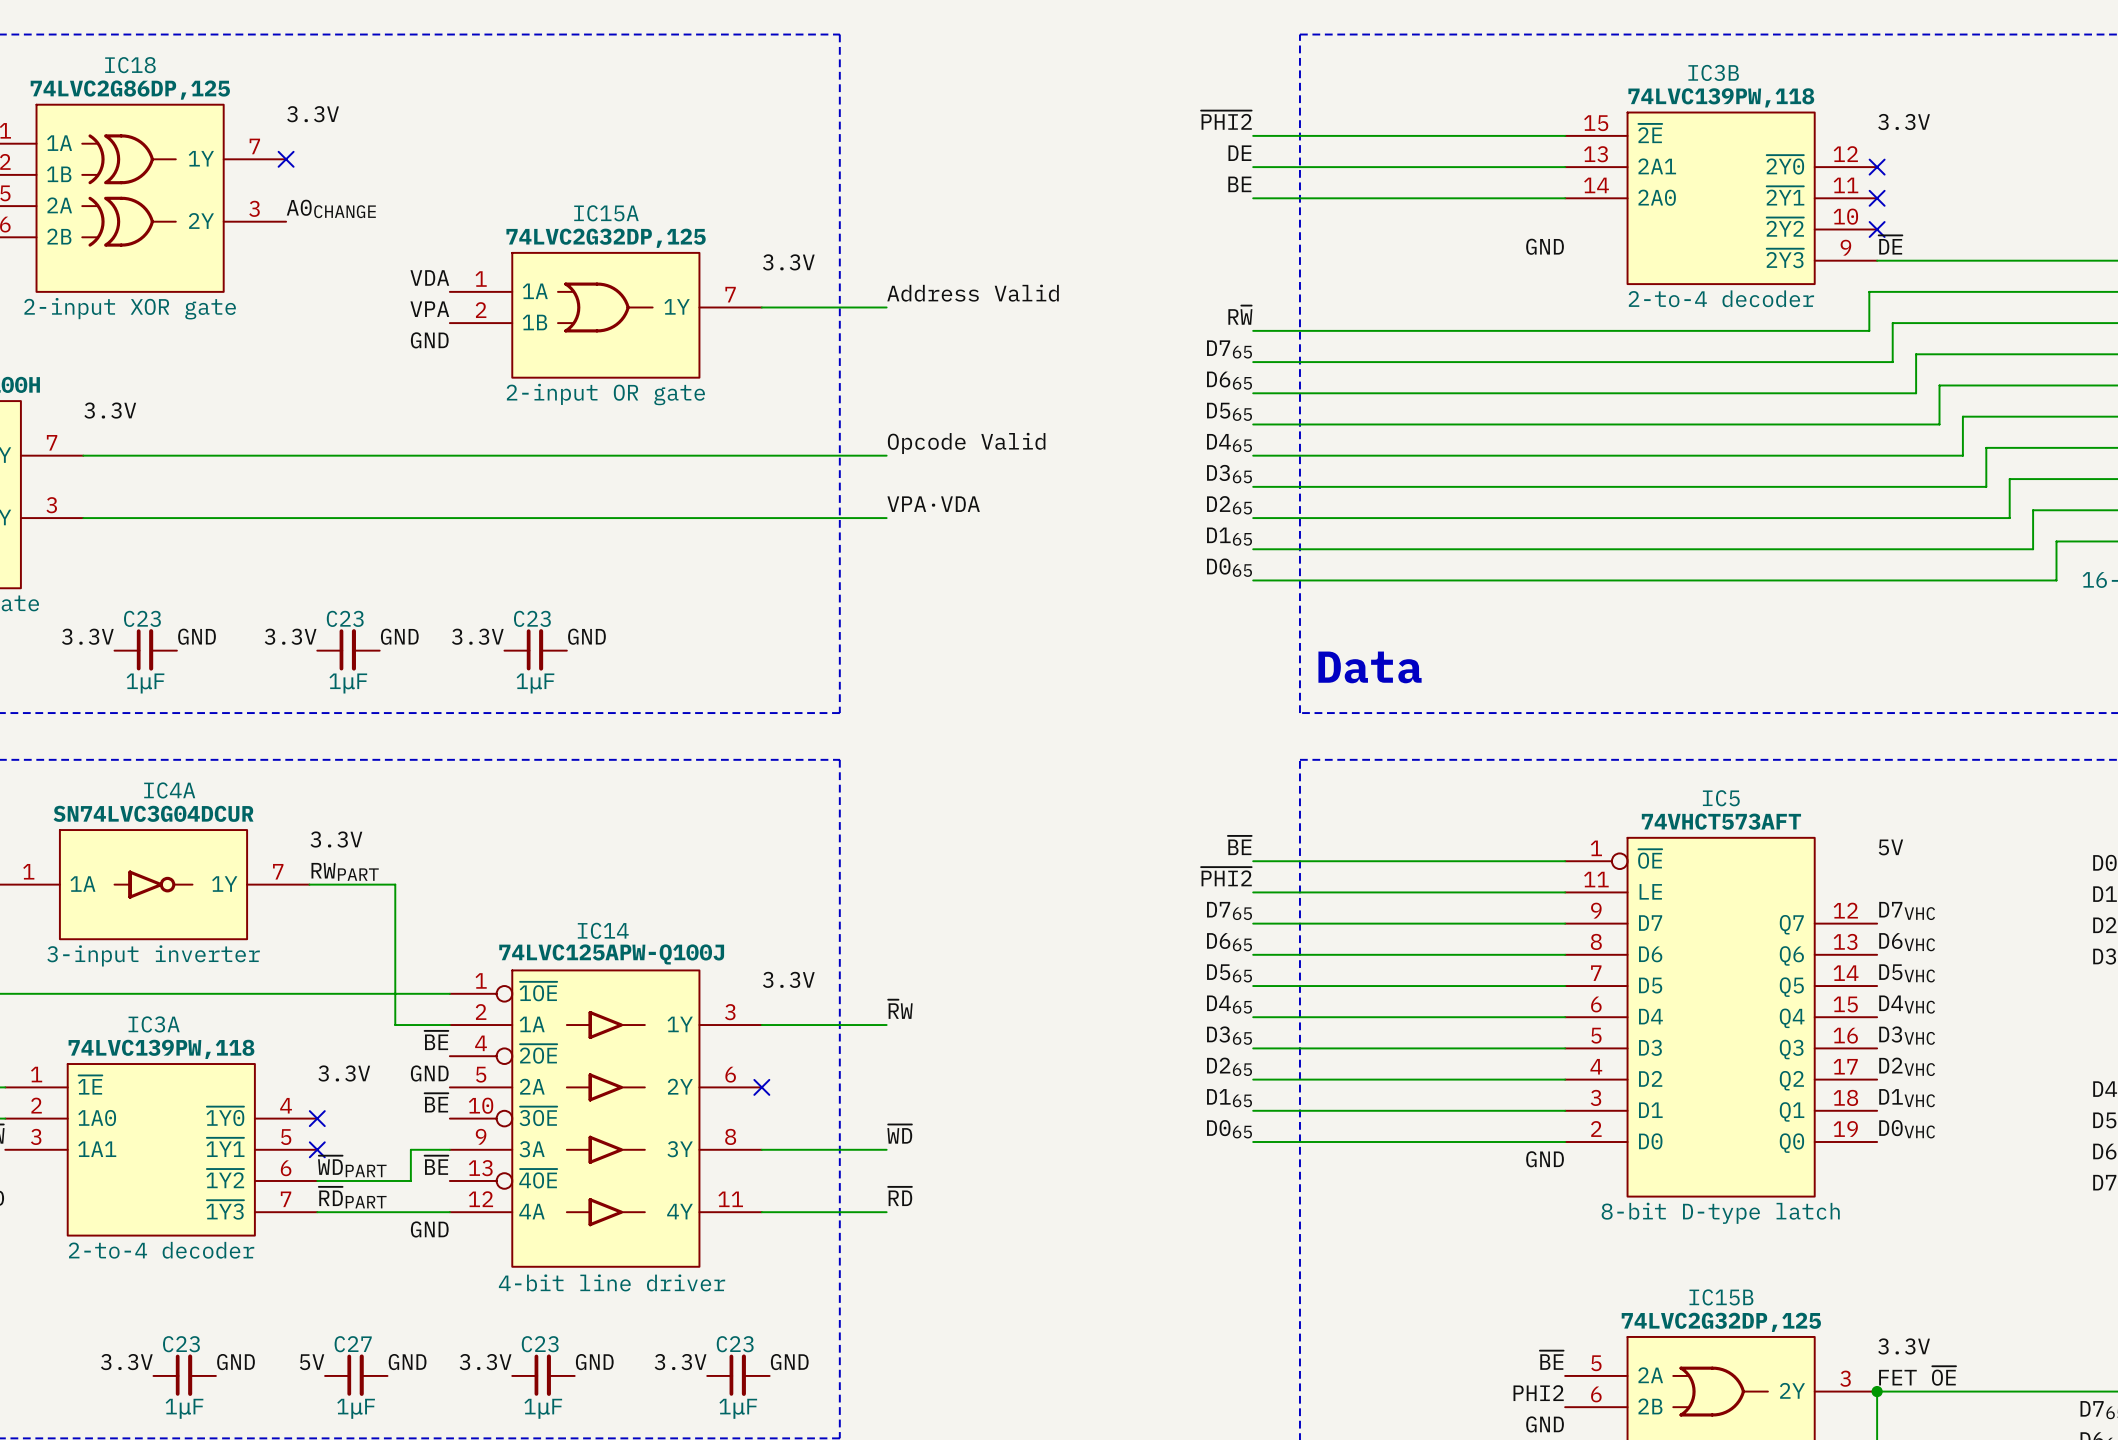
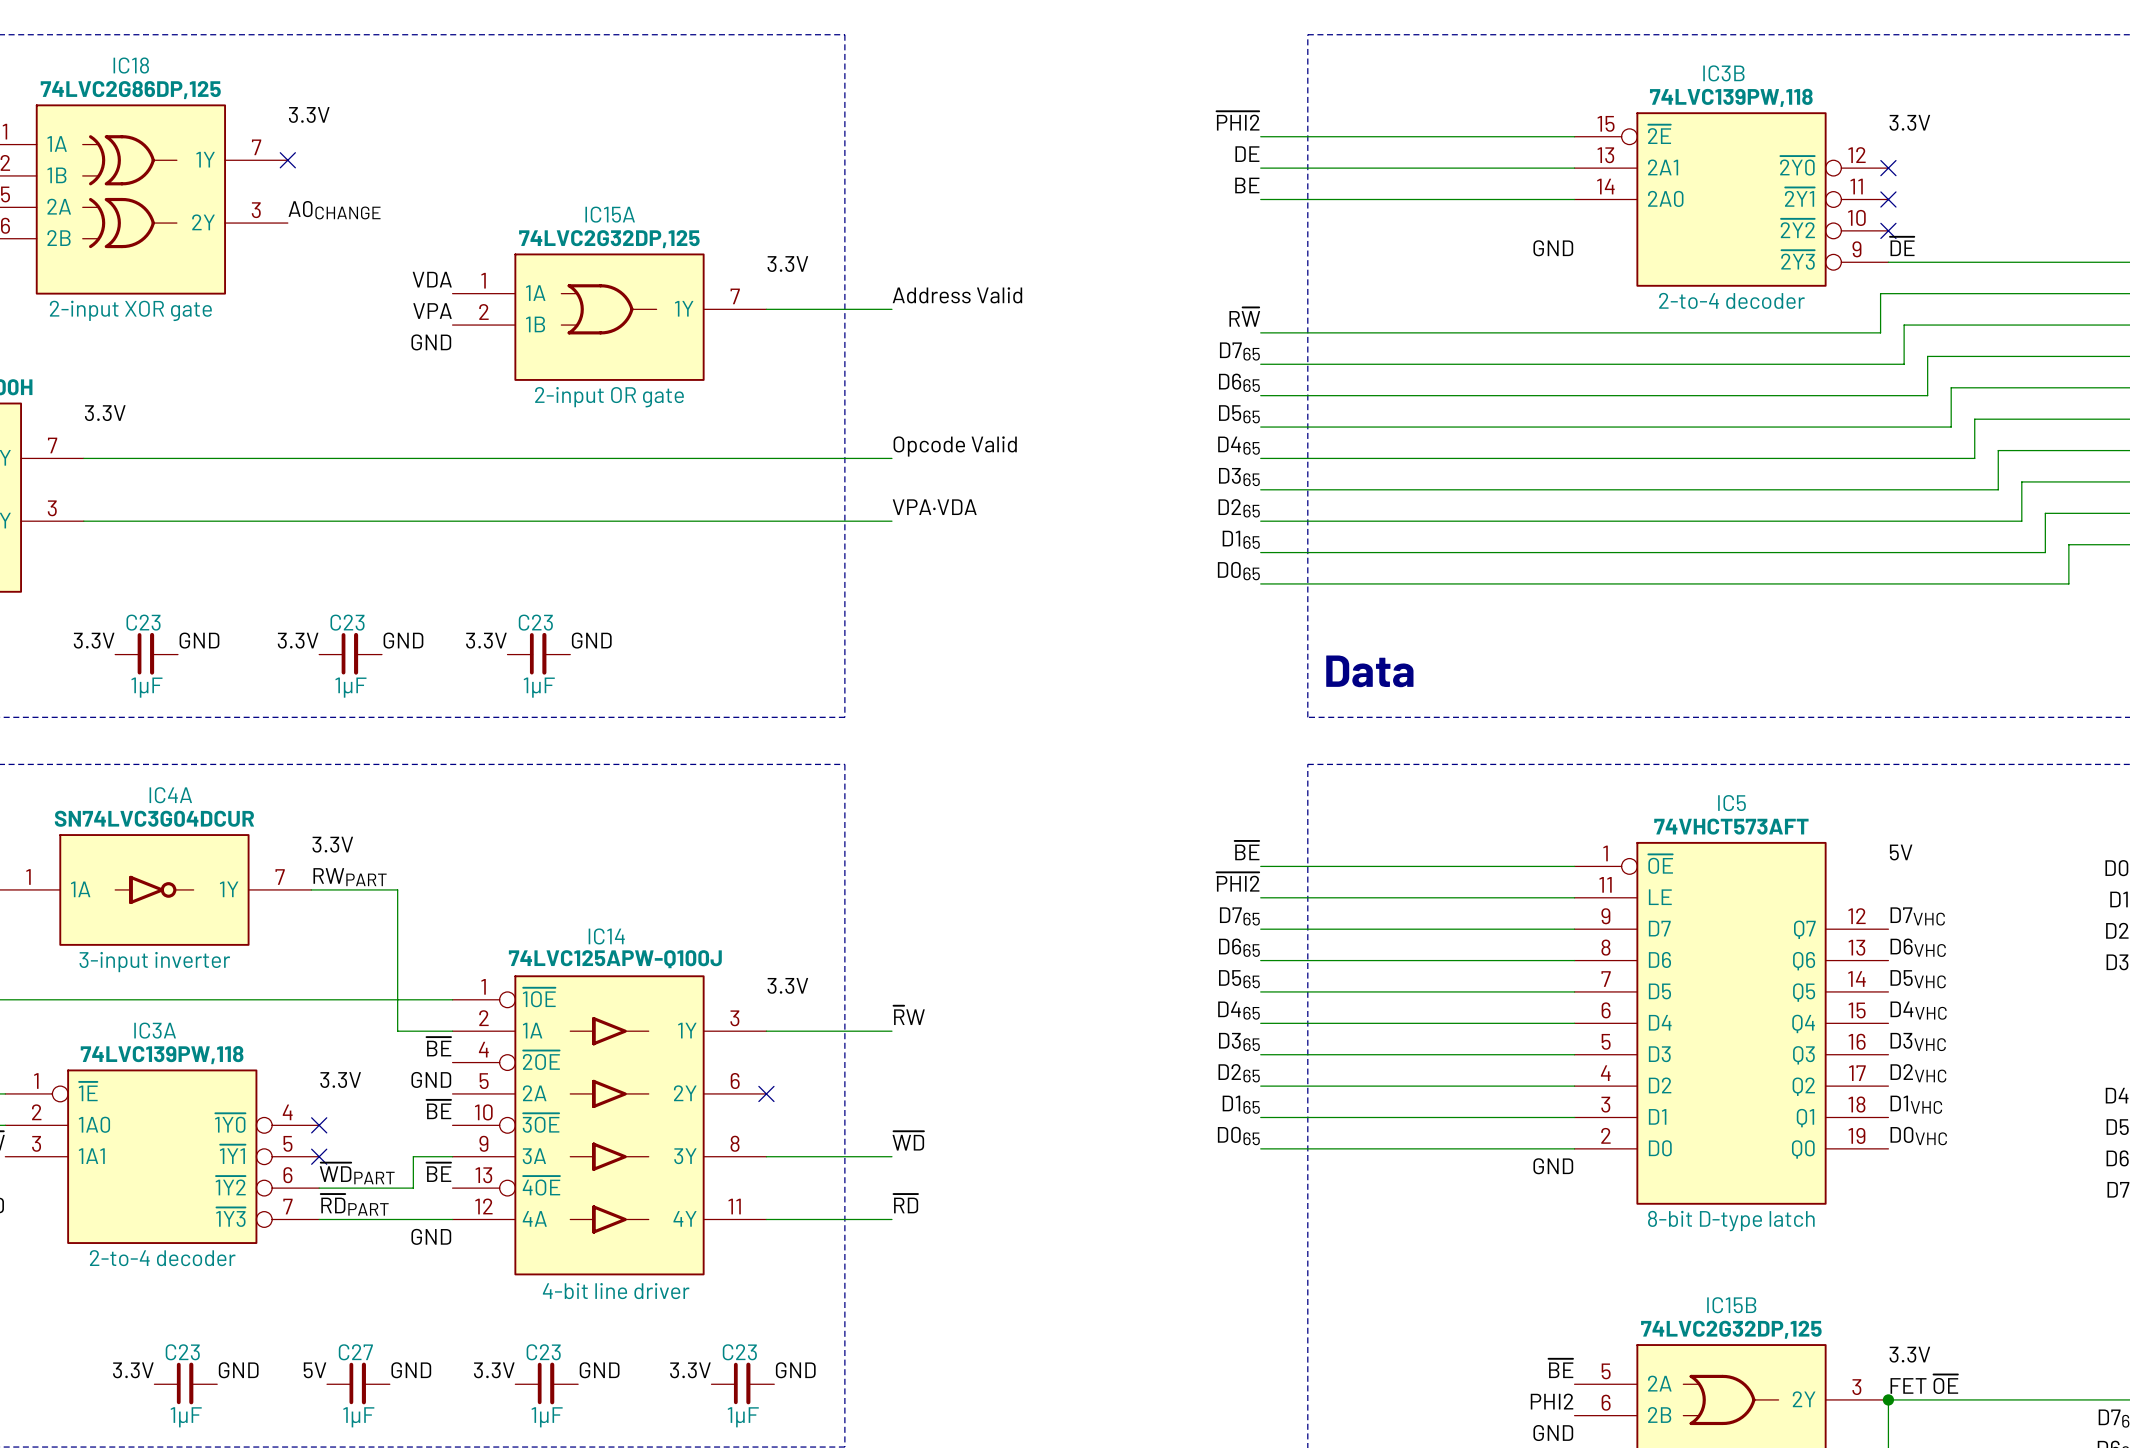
IC3B symbol: [1565, 111, 1878, 286] -> [1574, 112, 1889, 287]
IC3A symbol: [5, 1063, 318, 1237] -> [5, 1069, 320, 1244]

